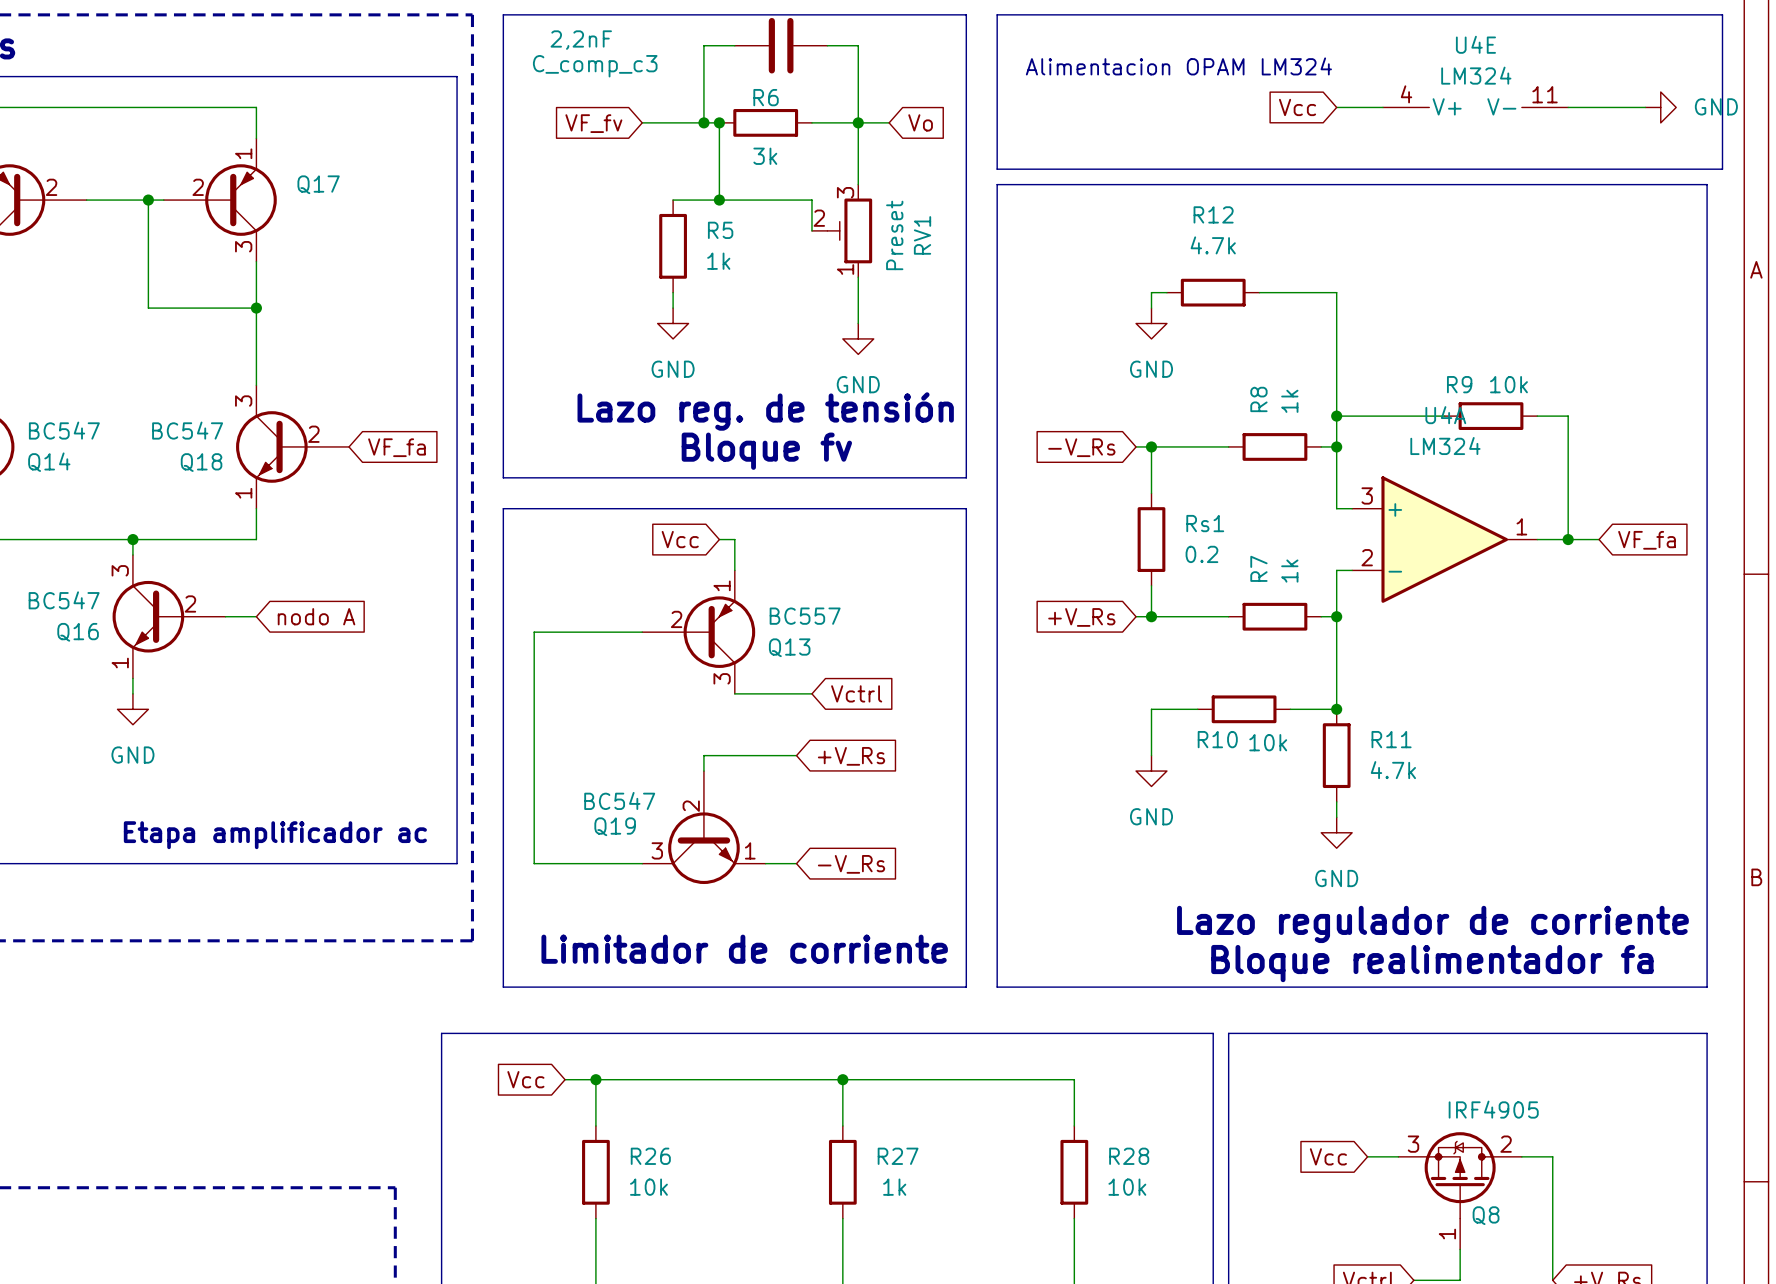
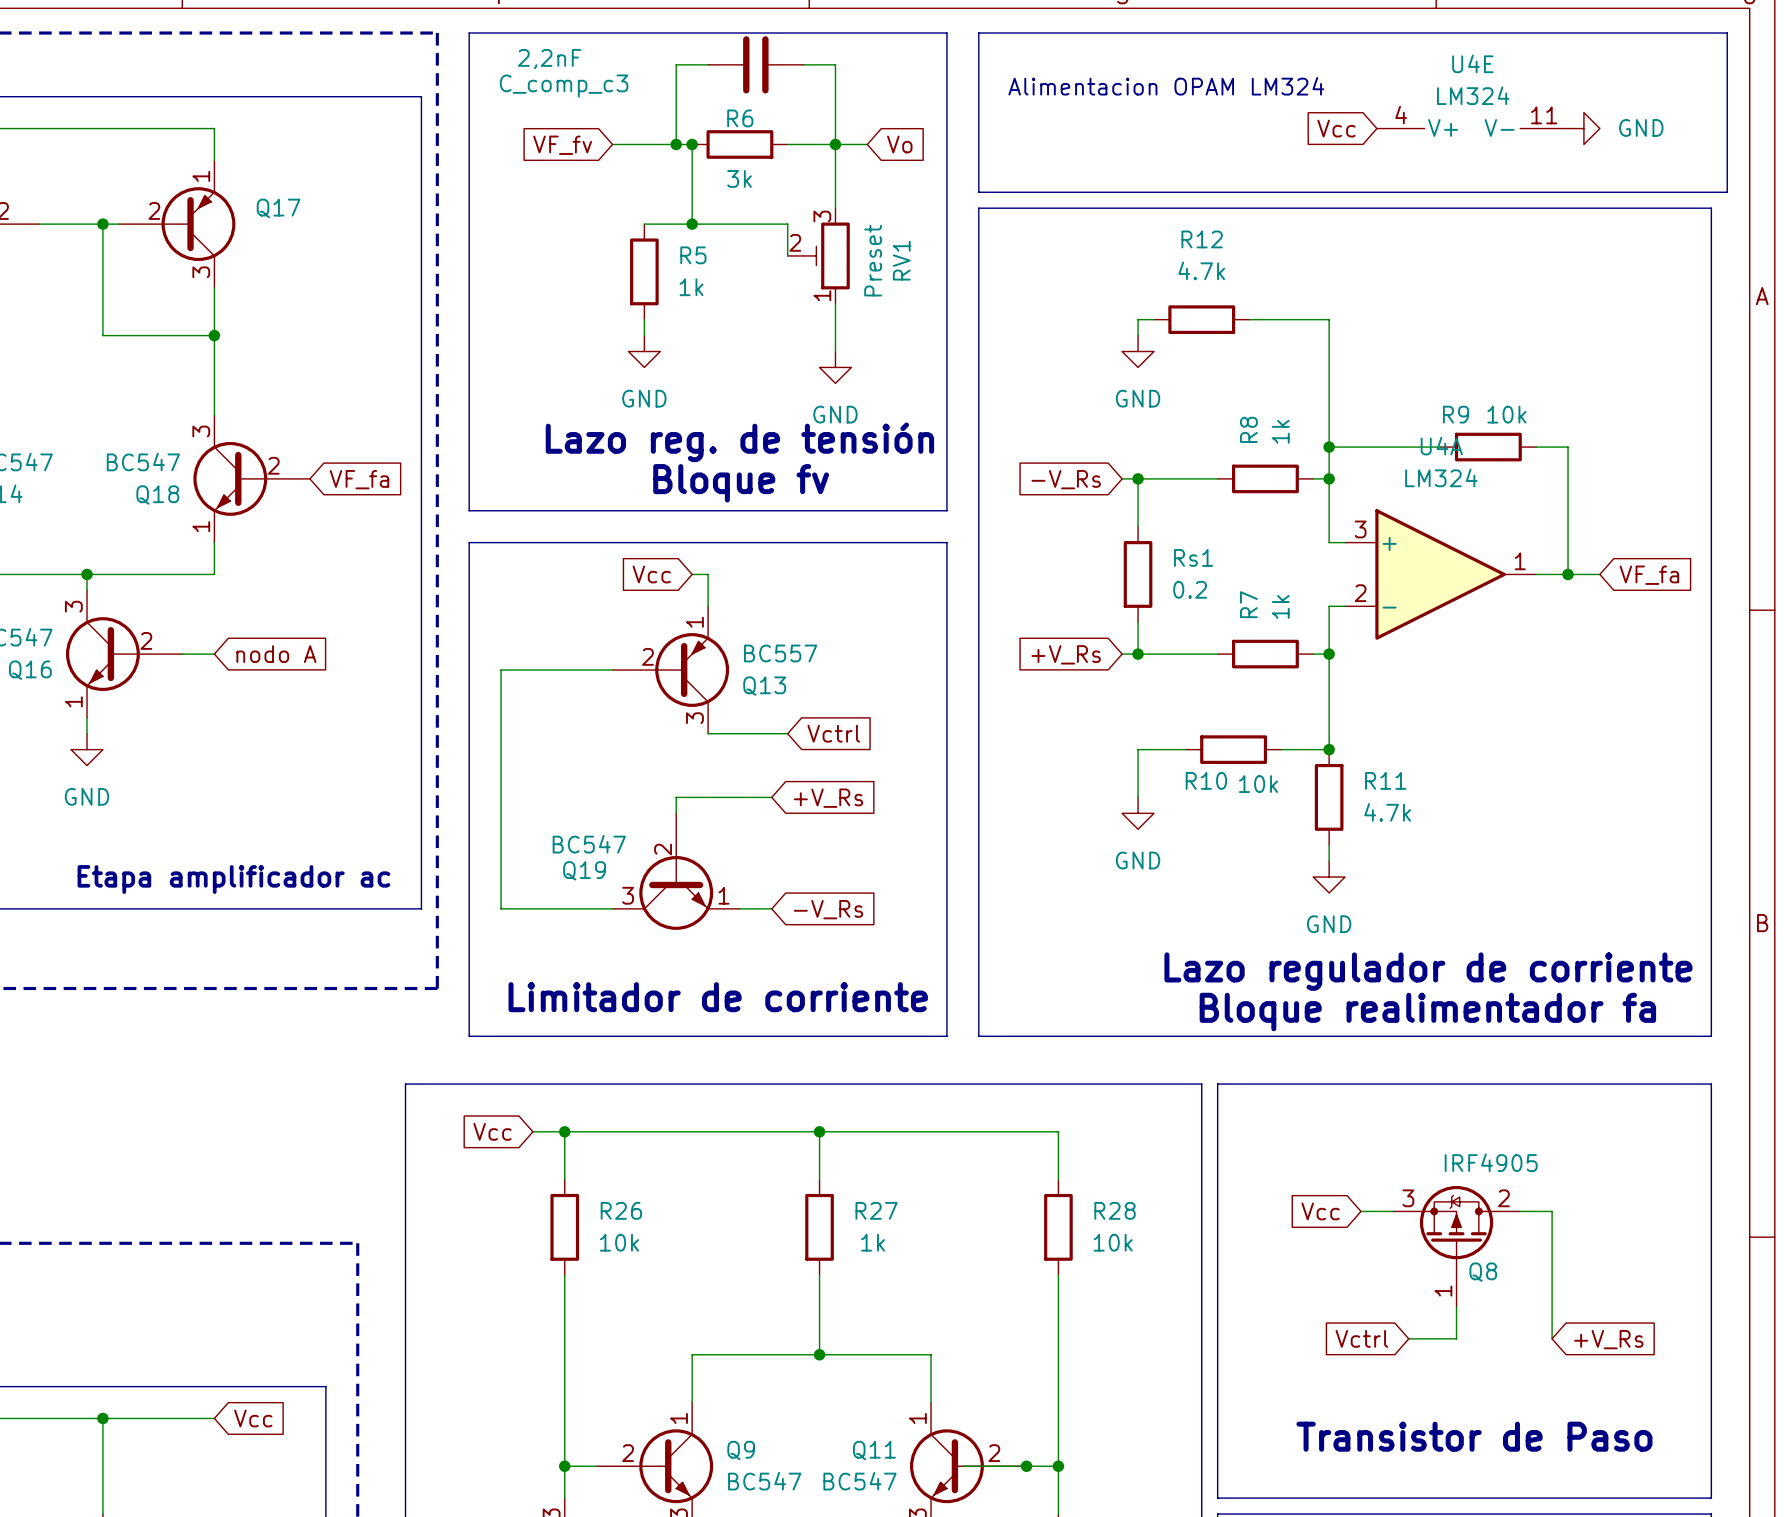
global label position: Vcc (1297, 107) -> Vcc (1336, 128)
wire: (1336, 107) (1382, 107) -> none
wire: (1568, 107) (1645, 107) -> none
power symbol position: GND (1660, 107) -> GND (1583, 128)

